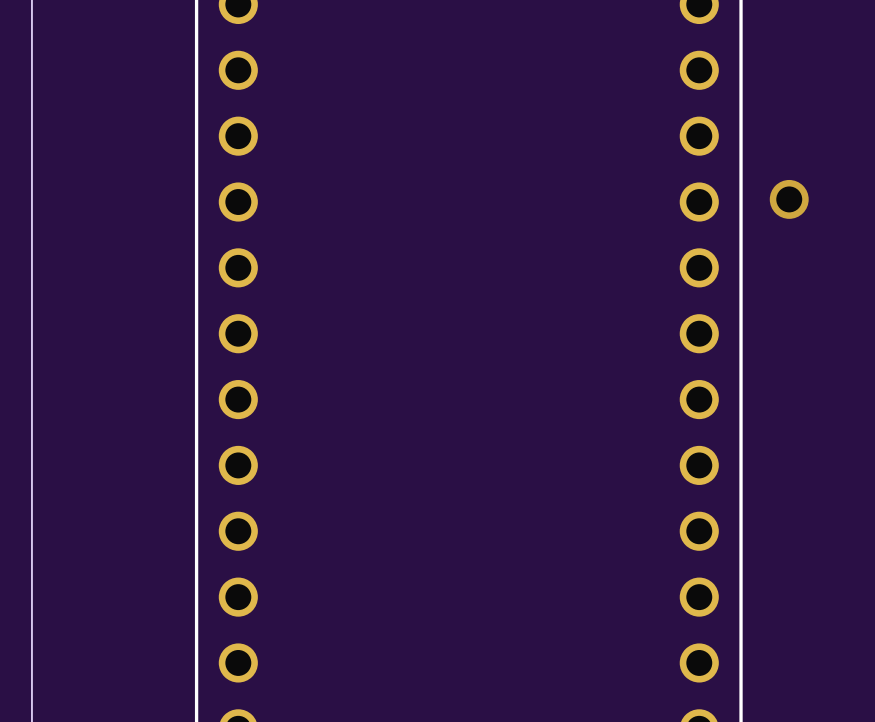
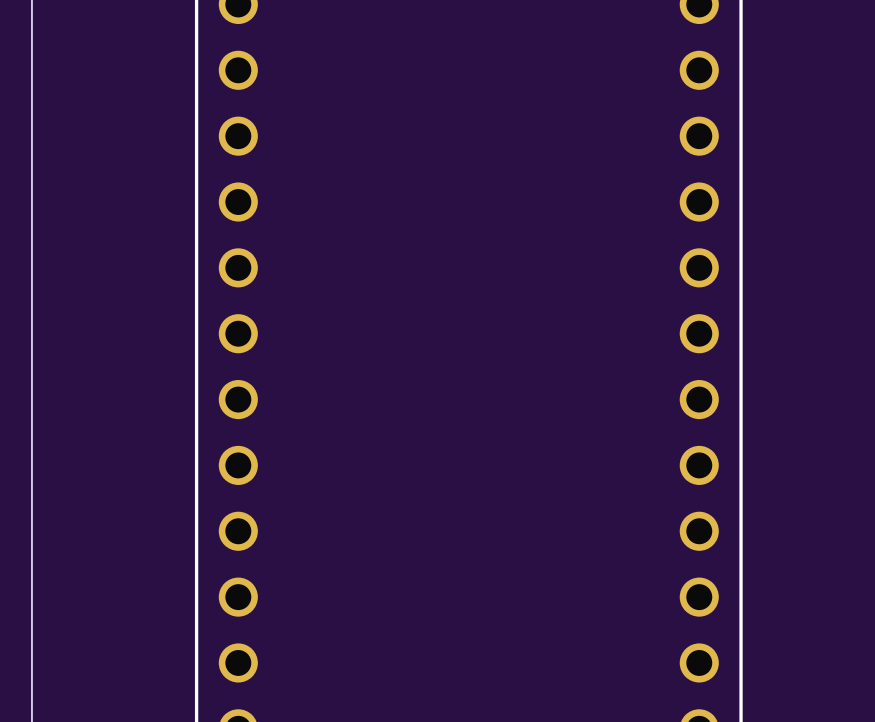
via: (789, 199) -> none

